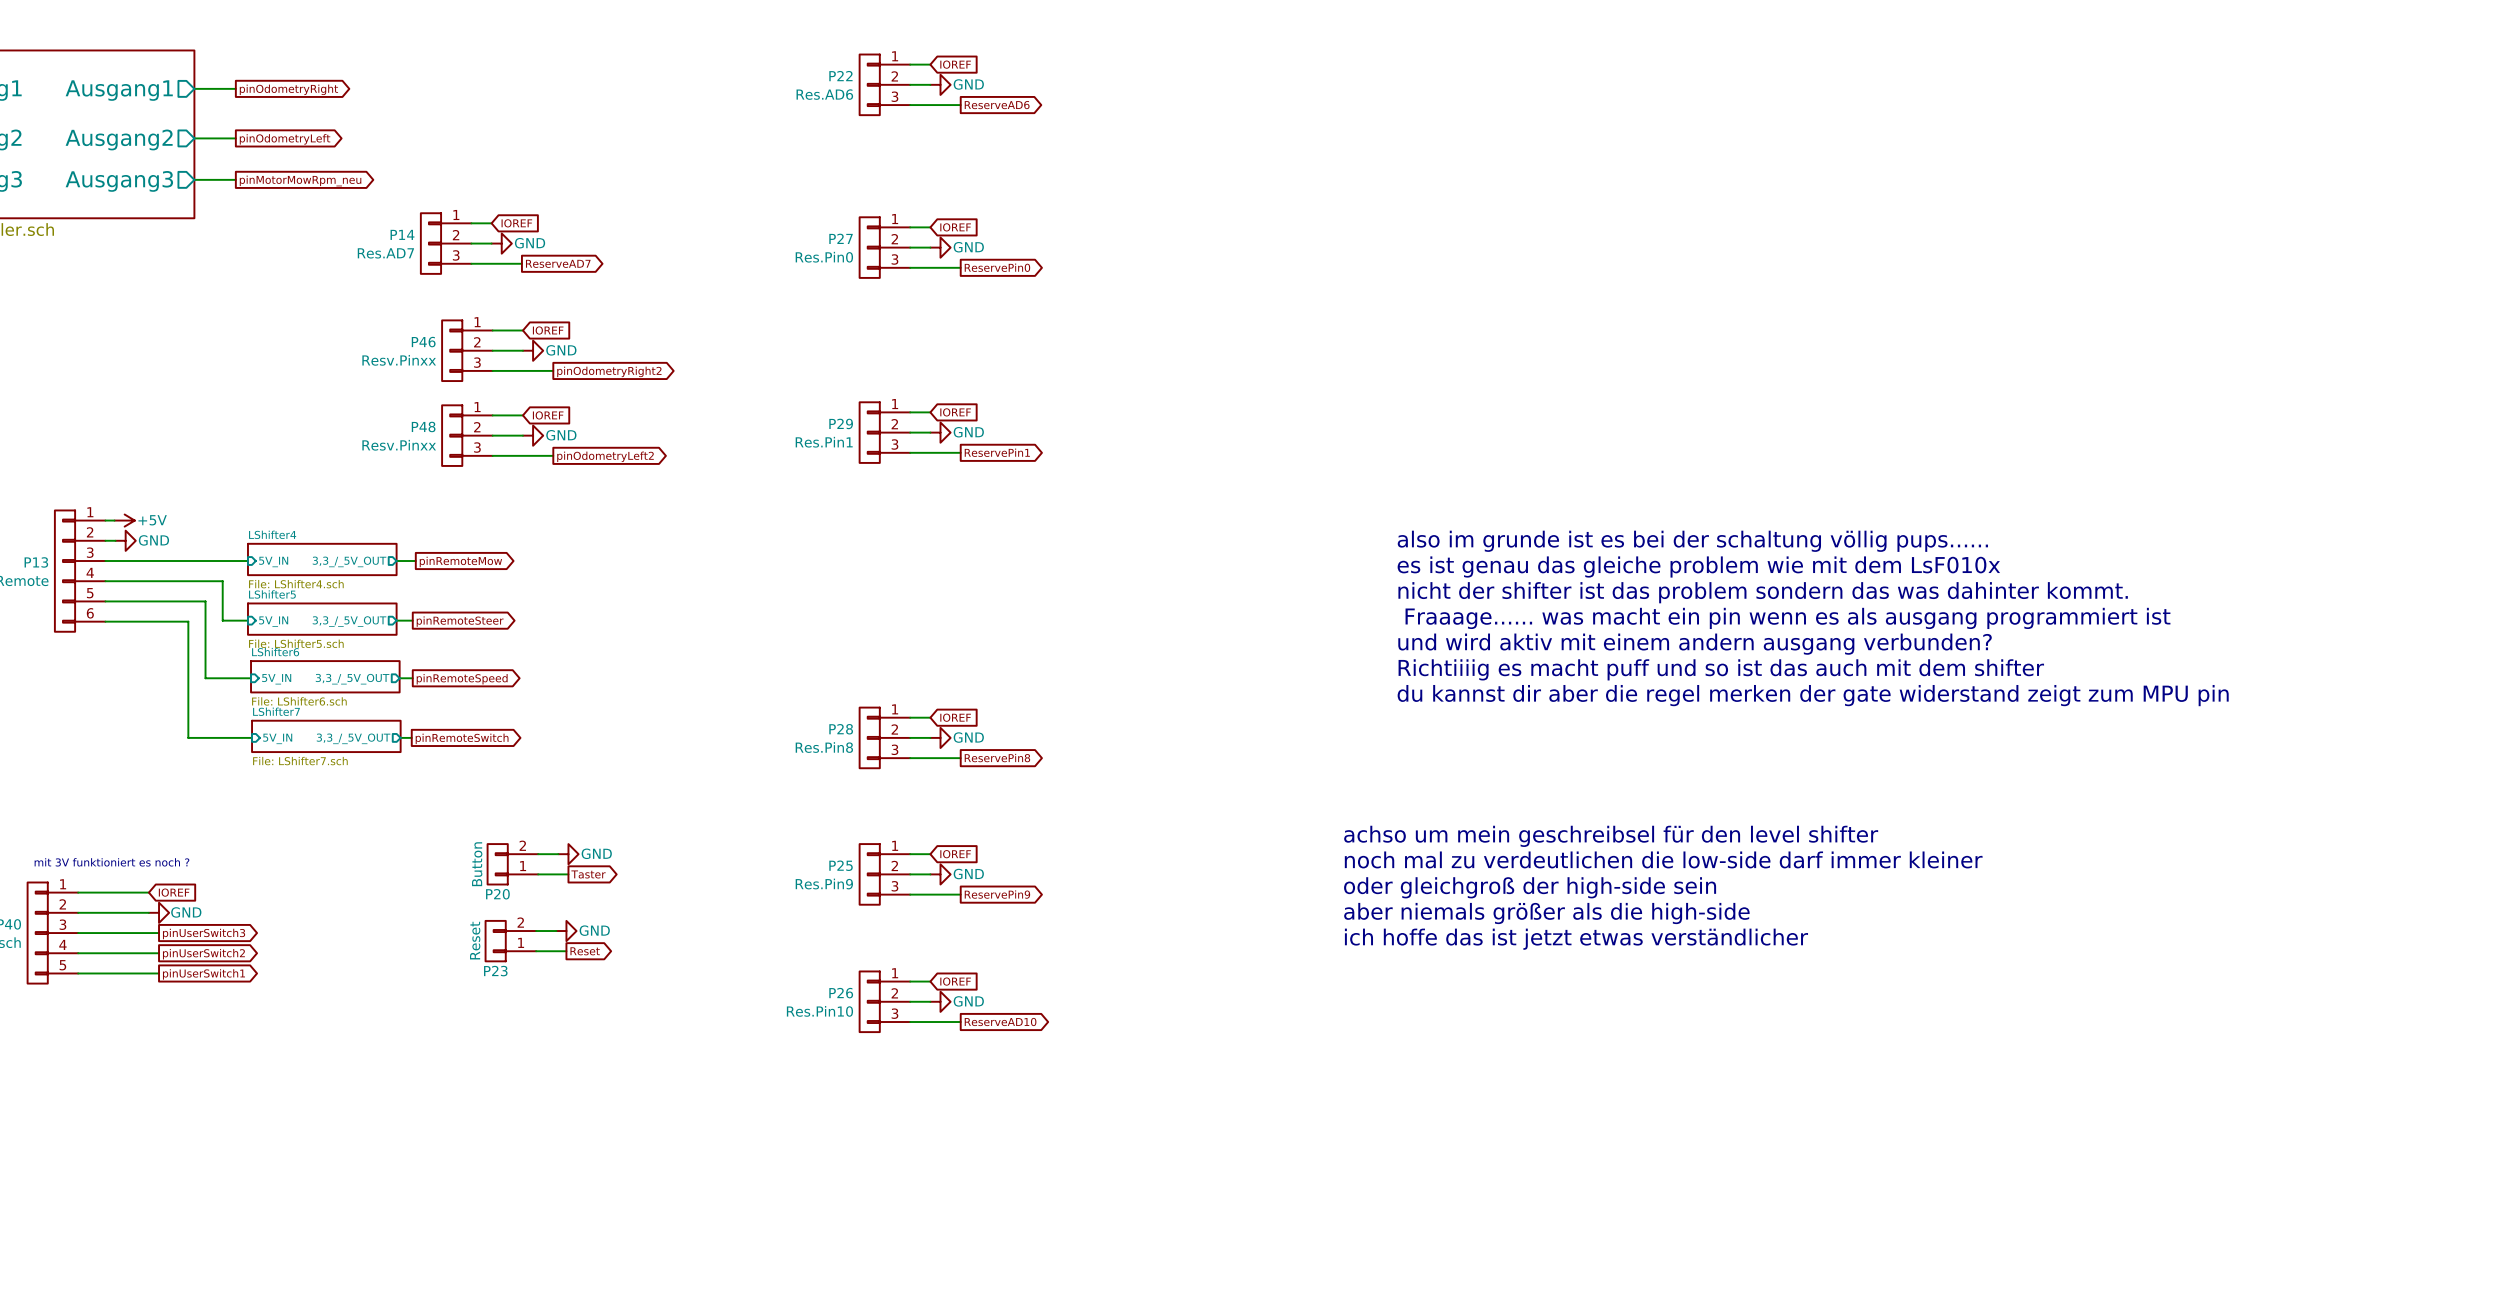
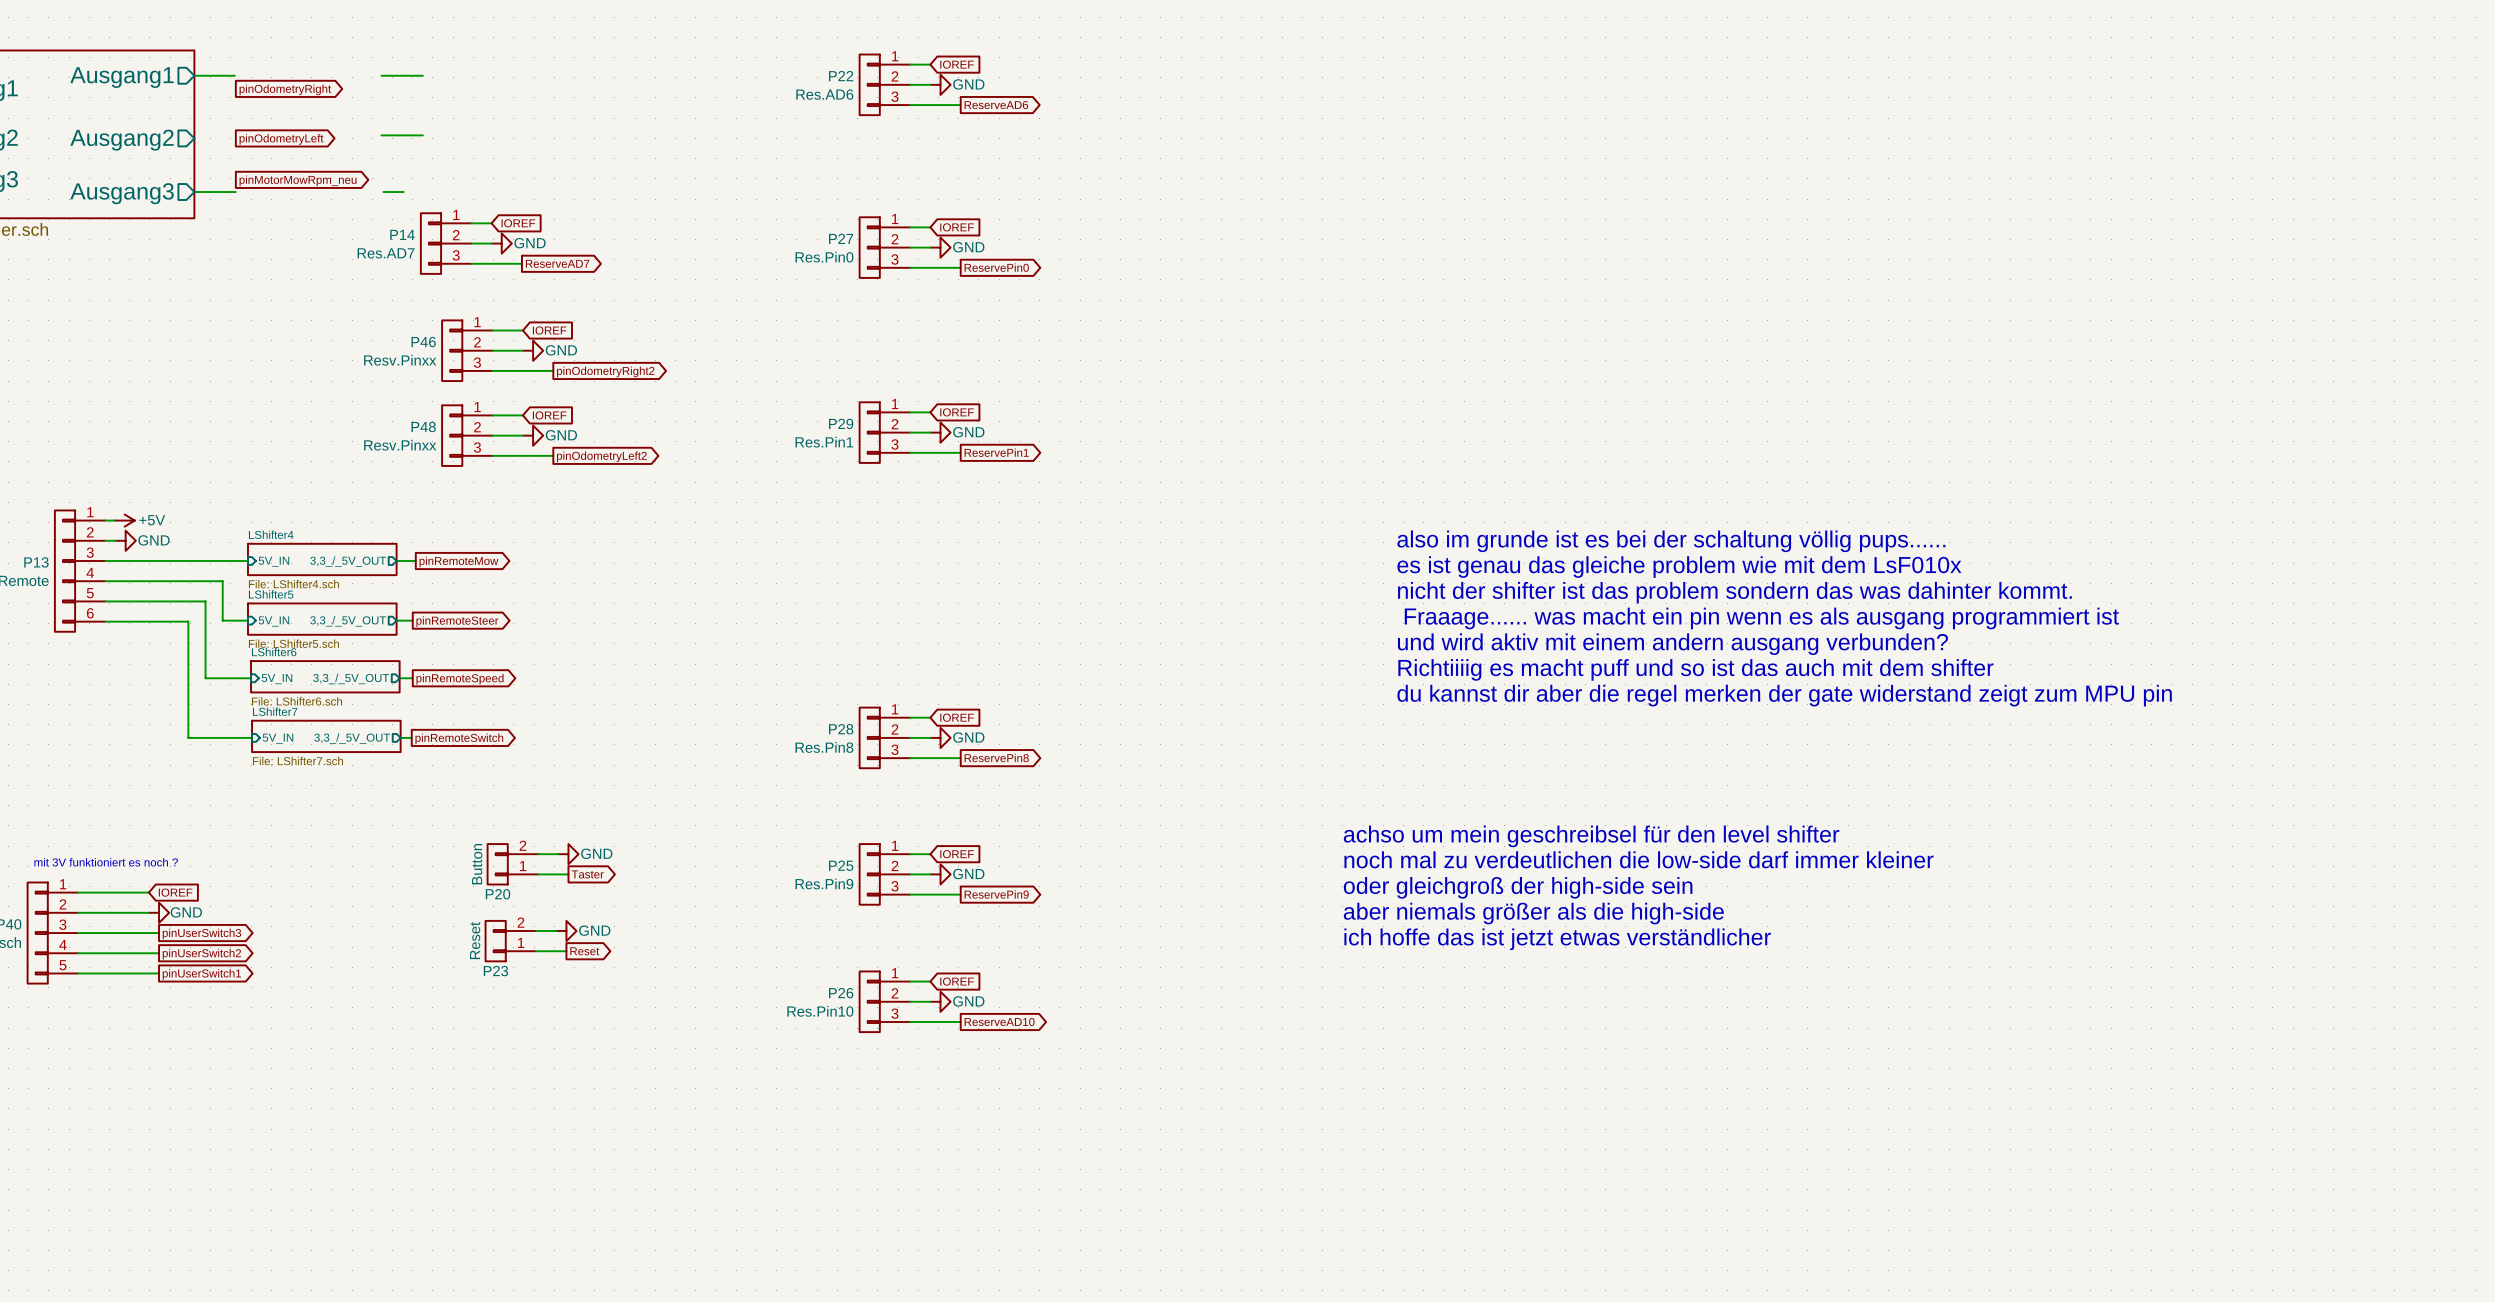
wire: none -> (194, 75) (234, 75)
wire: (194, 88) (235, 88) -> (381, 75) (422, 75)
sheet pin position: Ausgang1 (119, 90) -> Ausgang1 (121, 77)
wire: (194, 138) (235, 138) -> (381, 135) (422, 135)
wire: (194, 179) (235, 179) -> (194, 192) (235, 192)
sheet pin position: Ausgang3 (119, 181) -> Ausgang3 (122, 193)
wire: none -> (383, 192) (403, 192)

